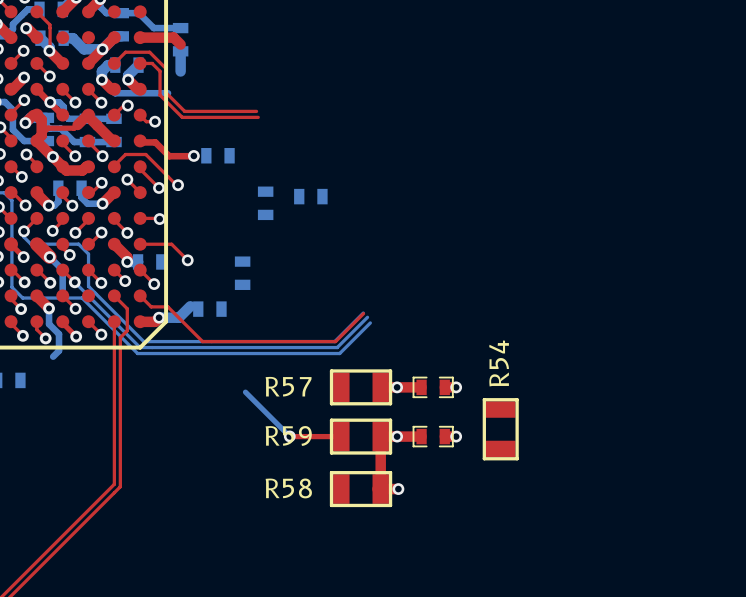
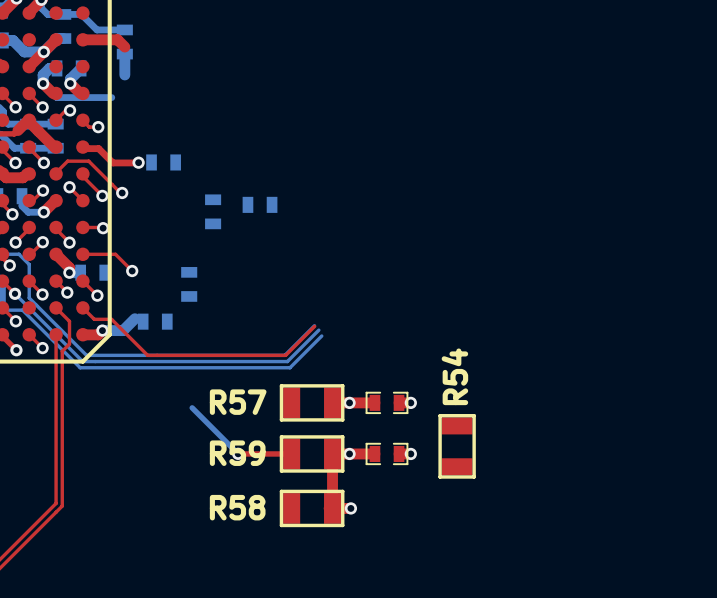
top track: (114, 63) (125, 52) (149, 52) (166, 68) (166, 92) (184, 111) (256, 111) -> none
top track: (140, 63) (152, 63) (160, 71) (160, 95) (182, 117) (258, 117) -> none

